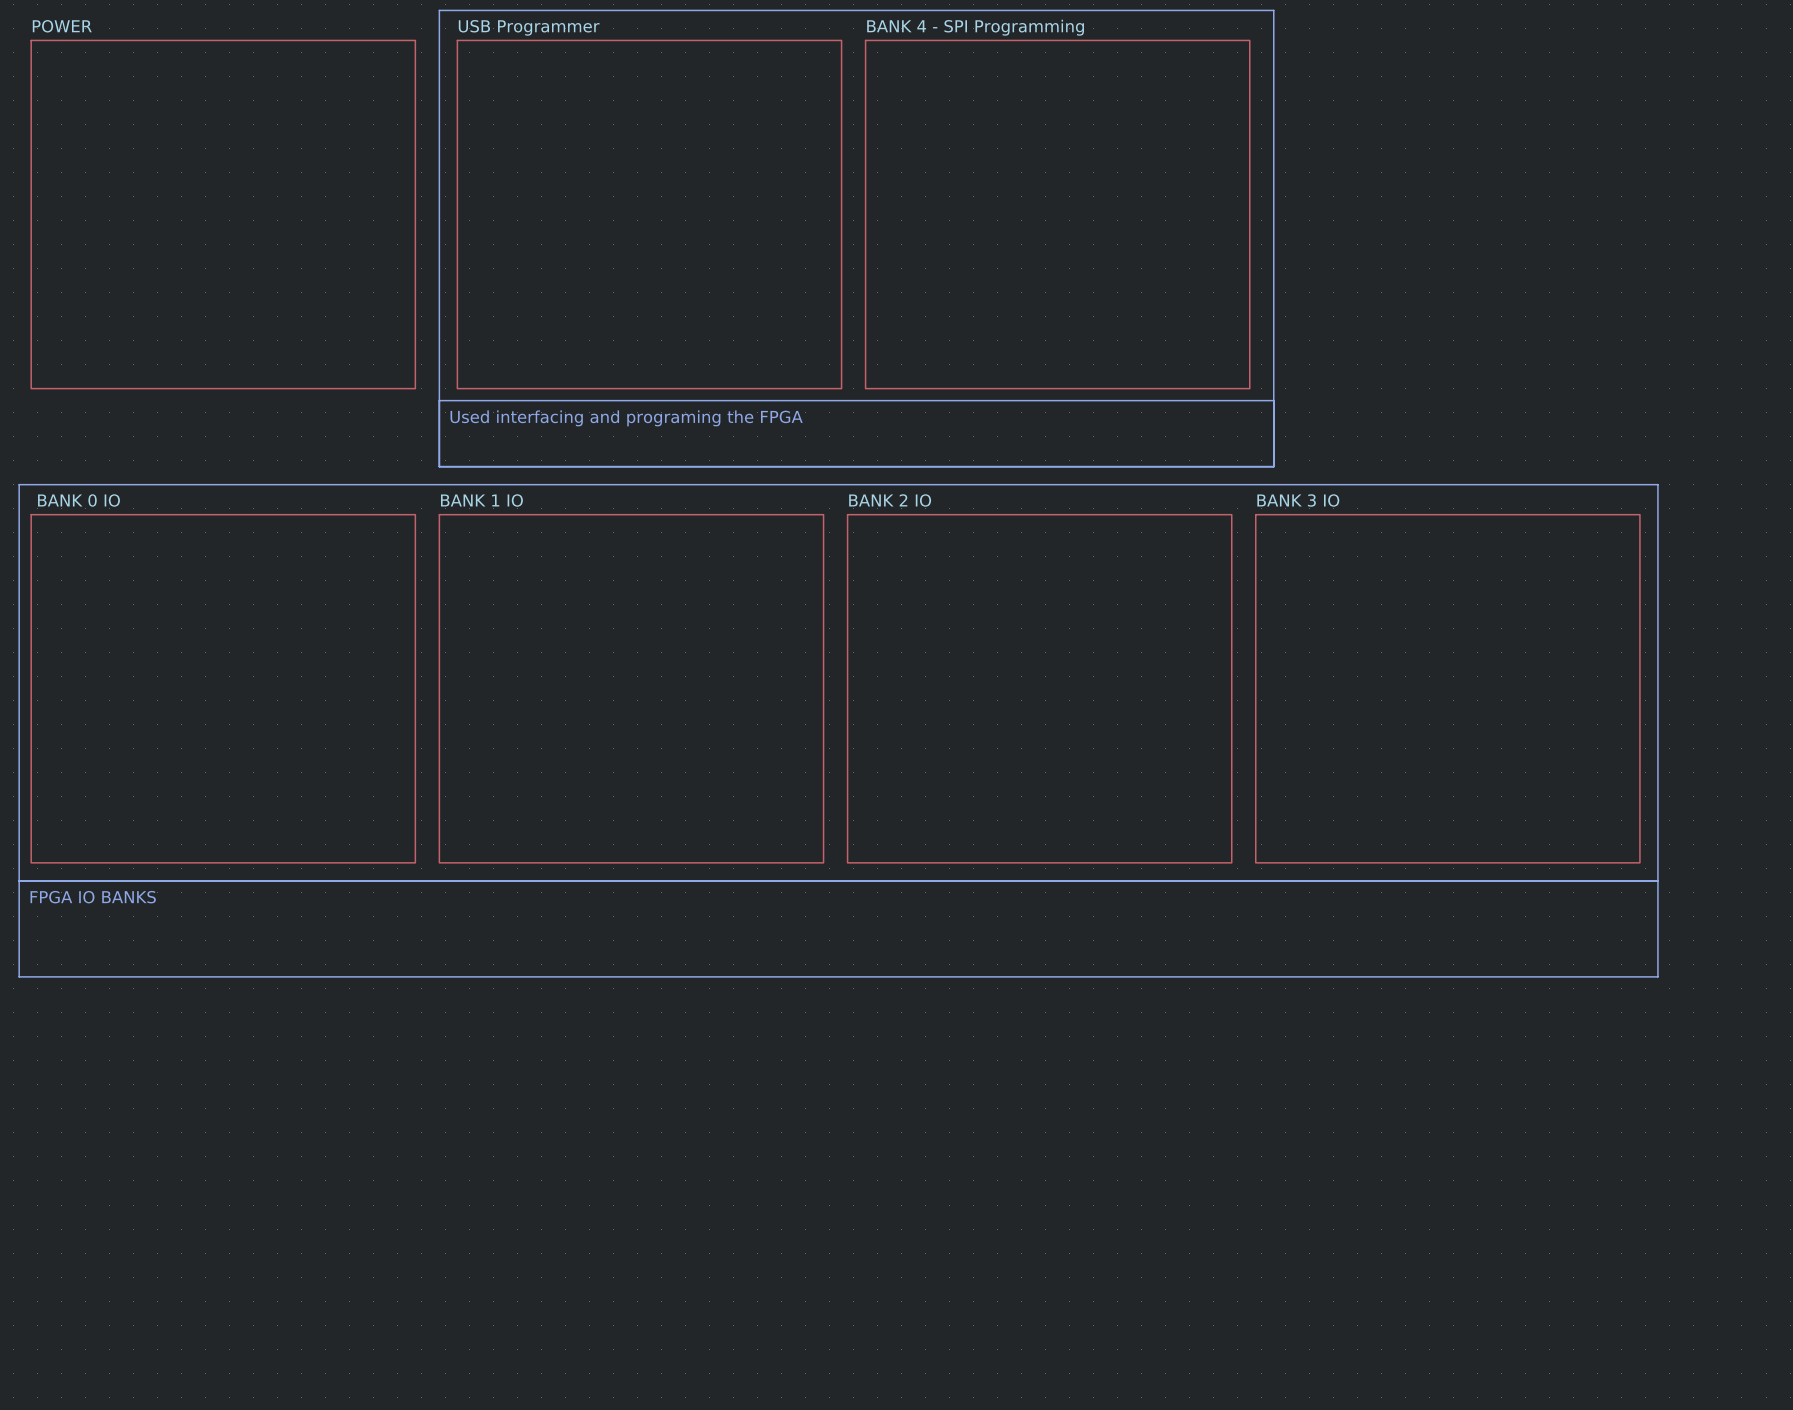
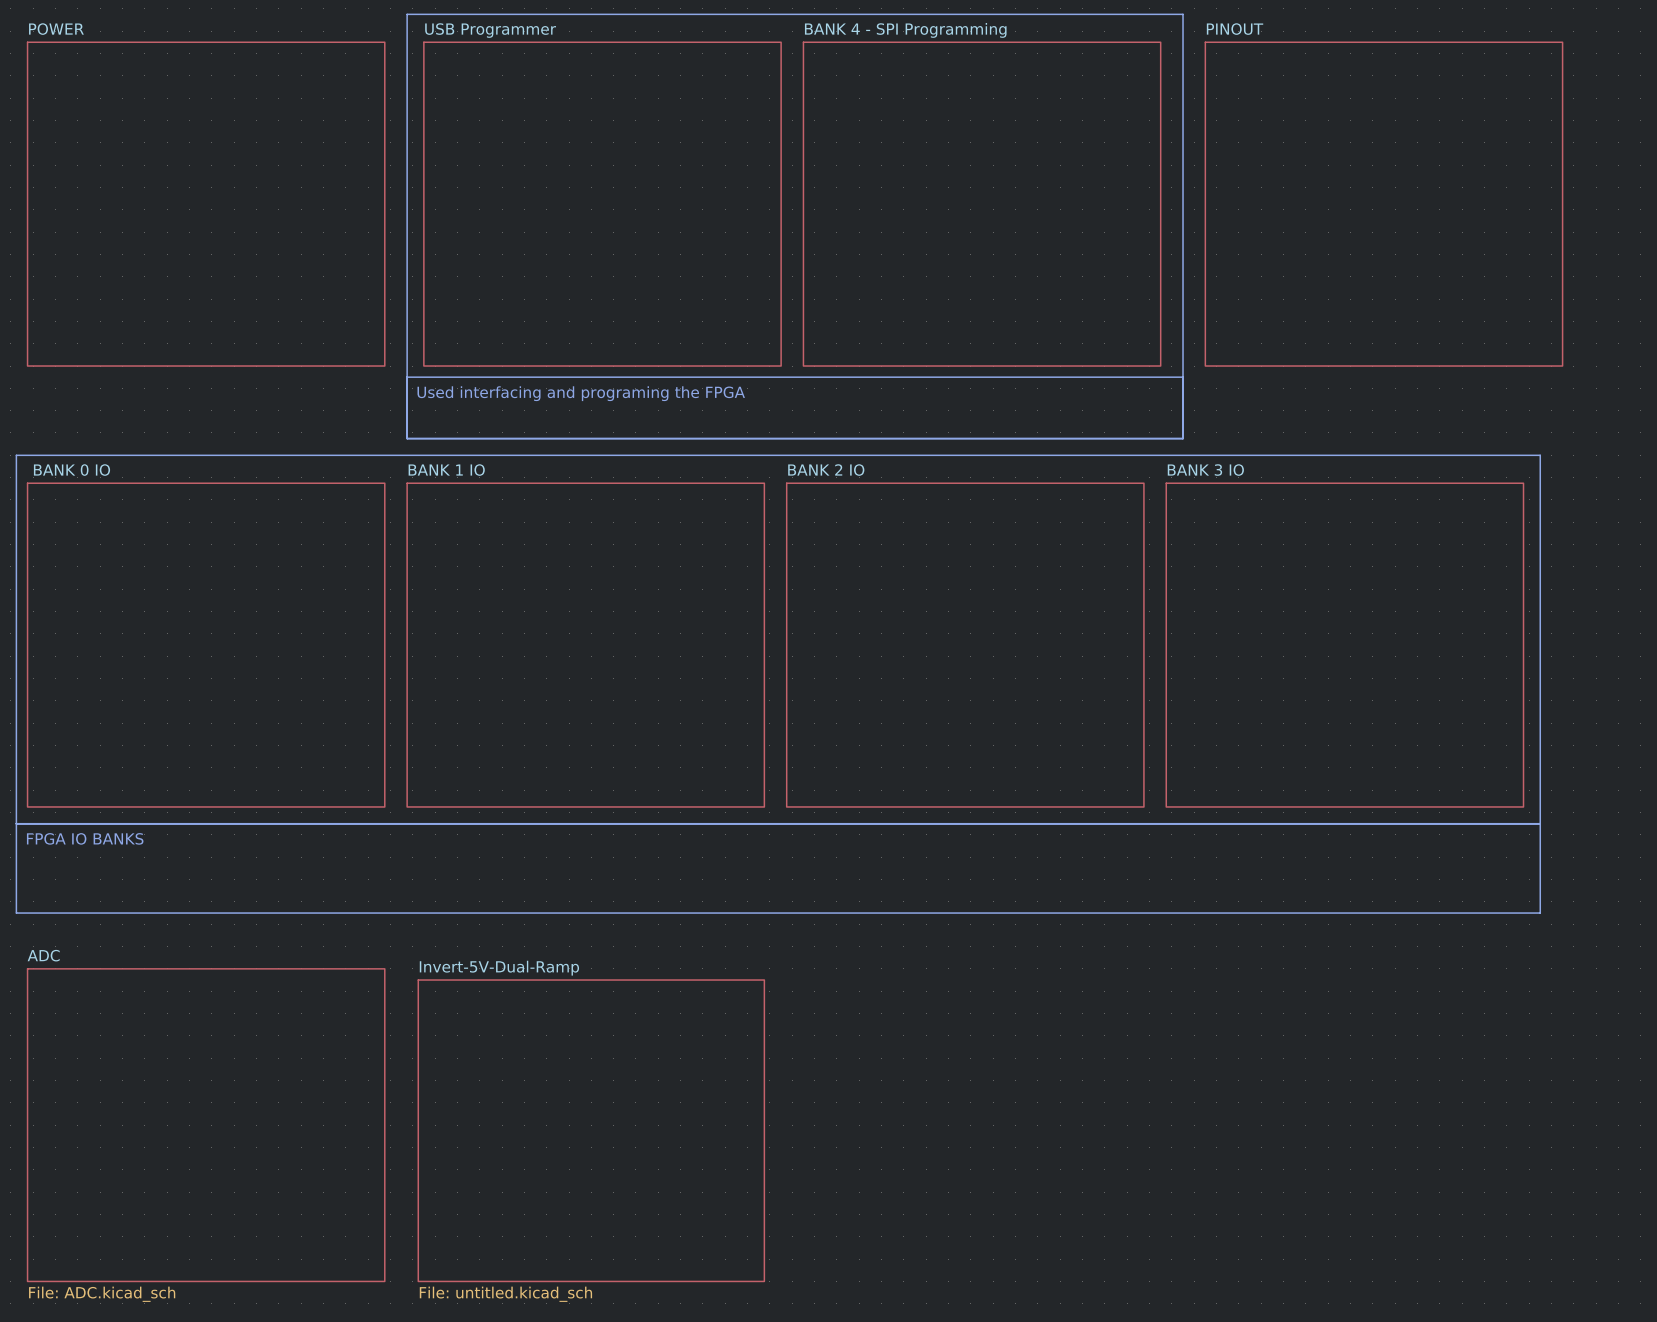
sheet PINOUT: none -> (1383, 204)
sheet ADC: none -> File: ADC.kicad_sch (206, 1125)
sheet Invert-5V-Dual-Ramp: none -> File: untitled.kicad_sch (591, 1130)

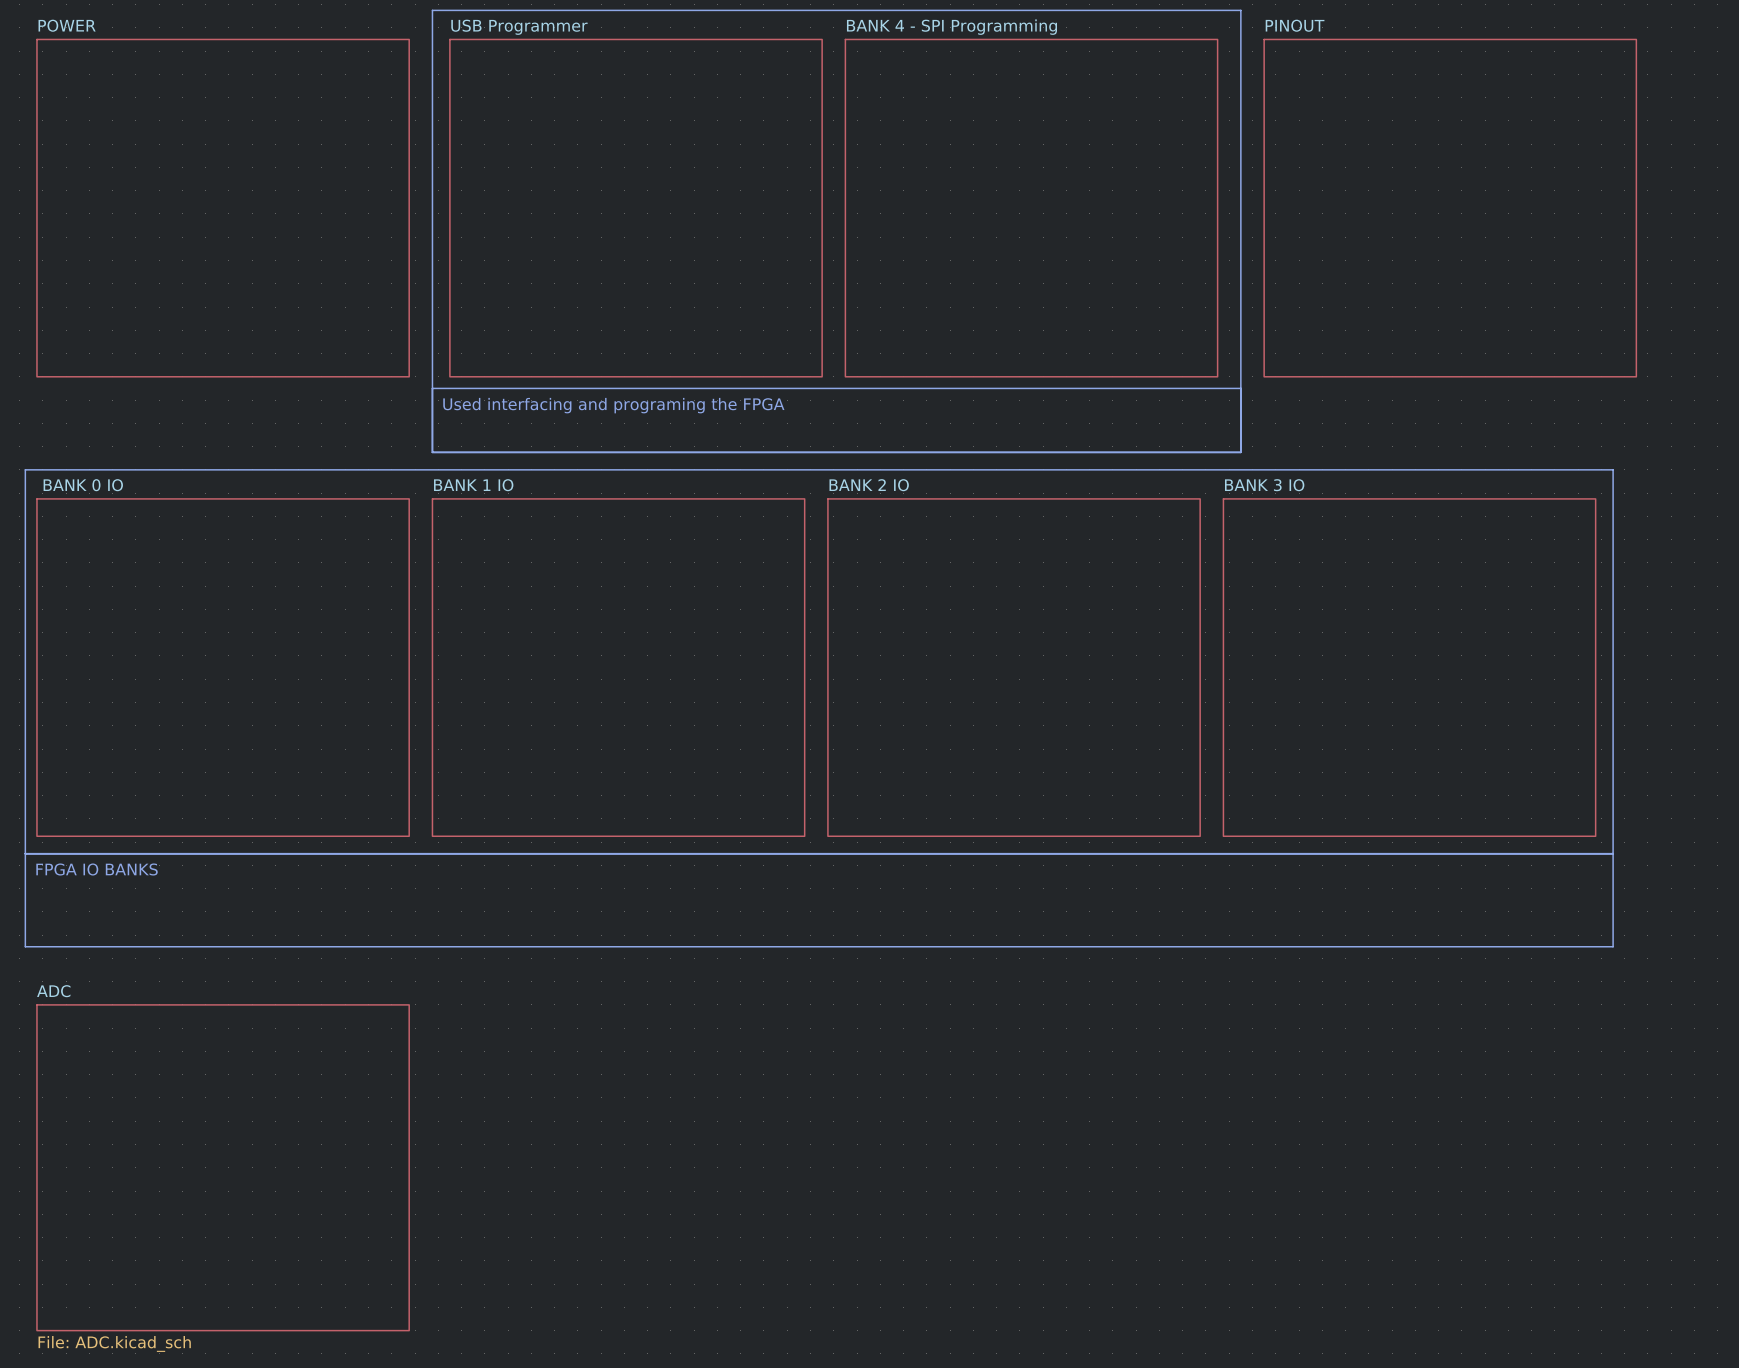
sheet Invert-5V-Dual-Ramp: File: untitled.kicad_sch (591, 1130) -> none

